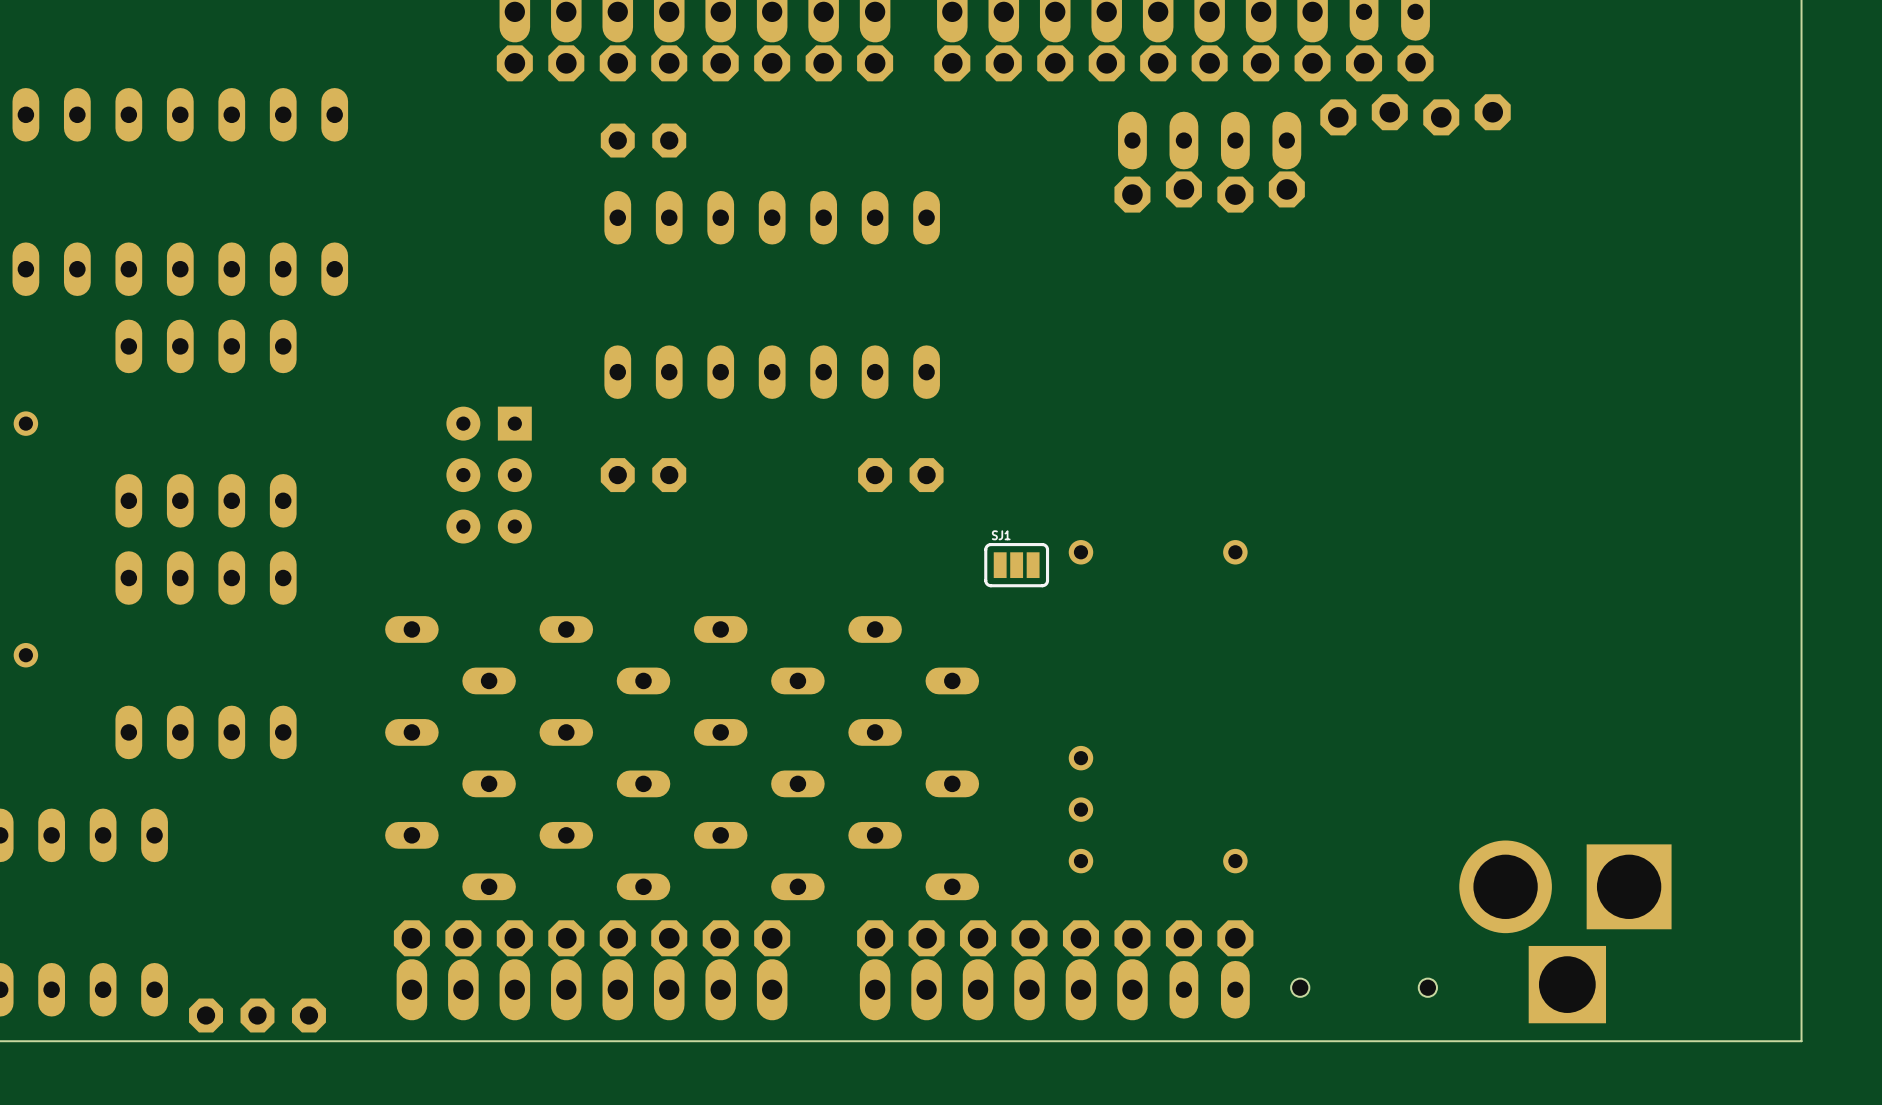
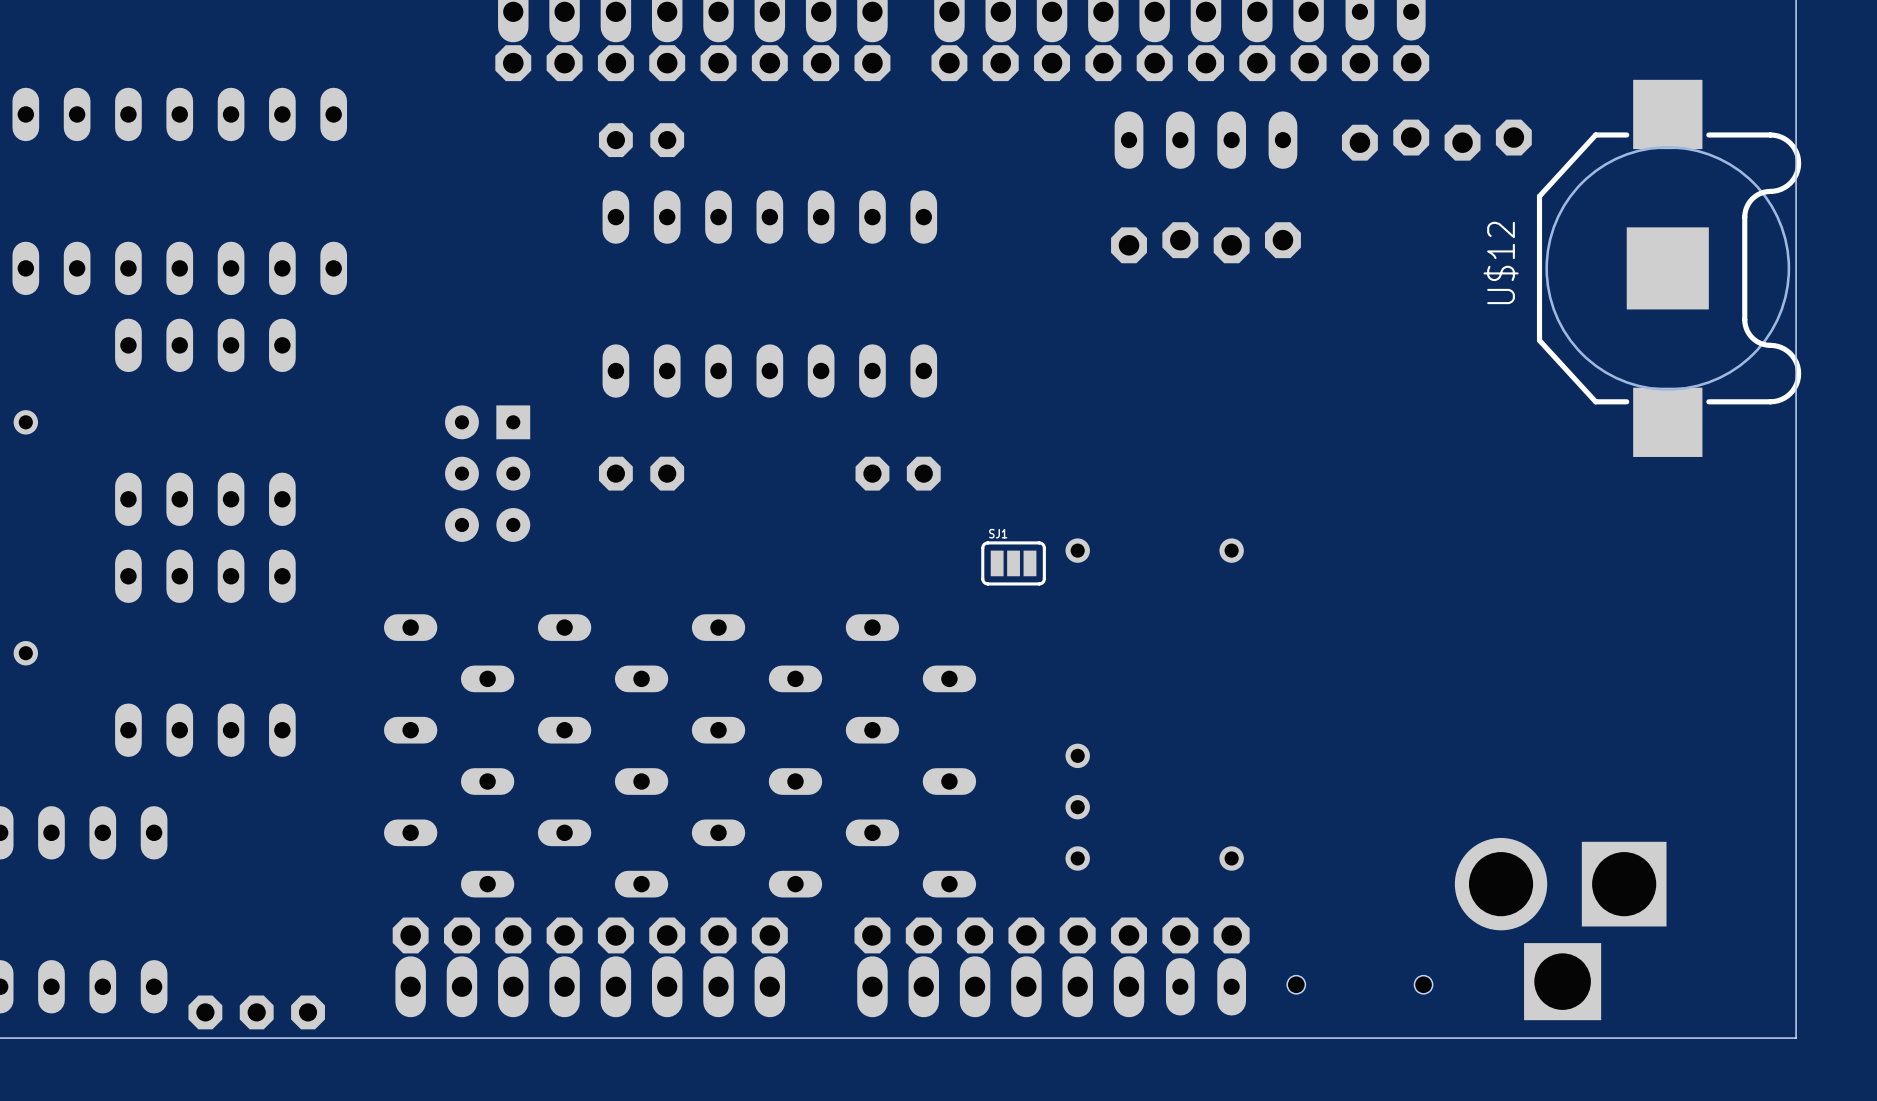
part position: (1415, 114) -> (1436, 140)
part position: (1209, 192) -> (1205, 242)
U$12: none -> (1669, 268)

